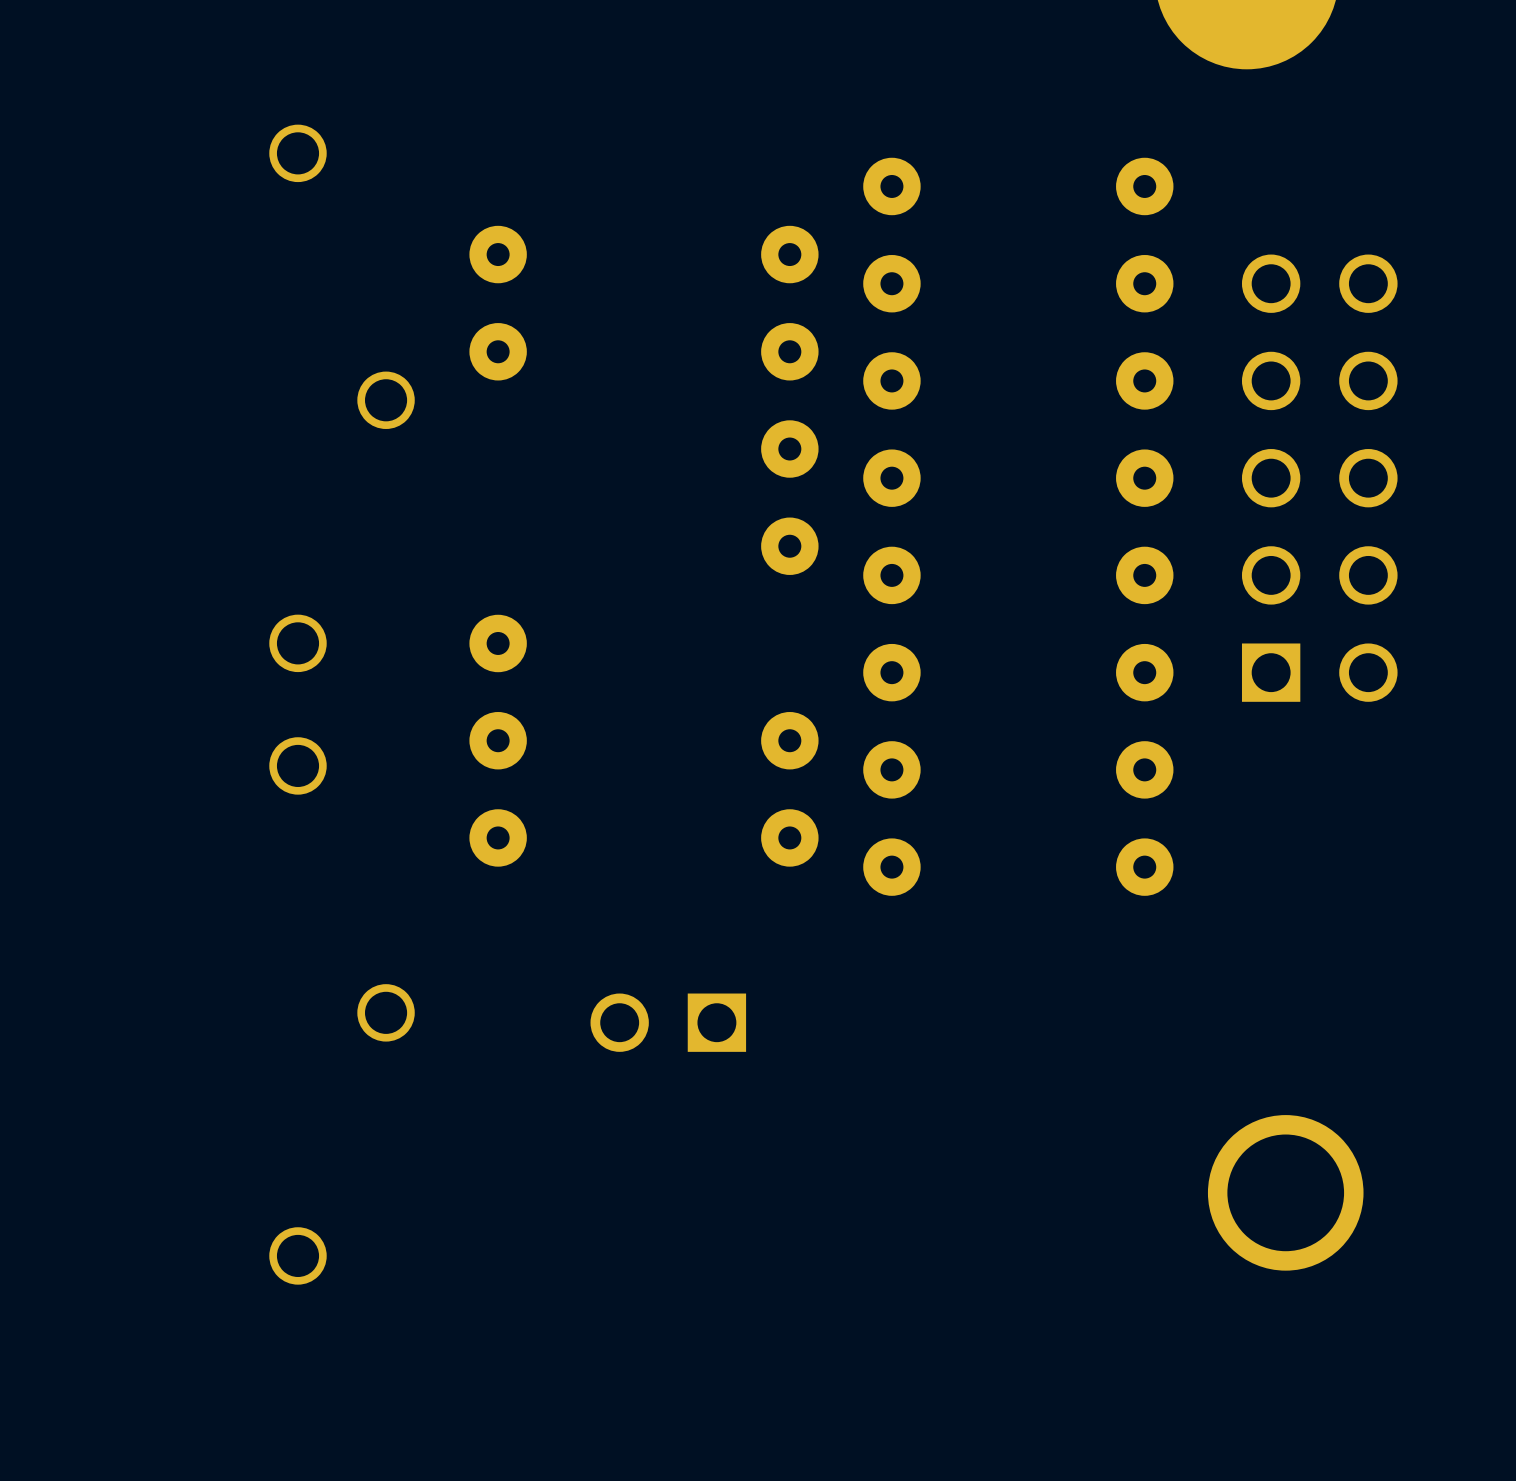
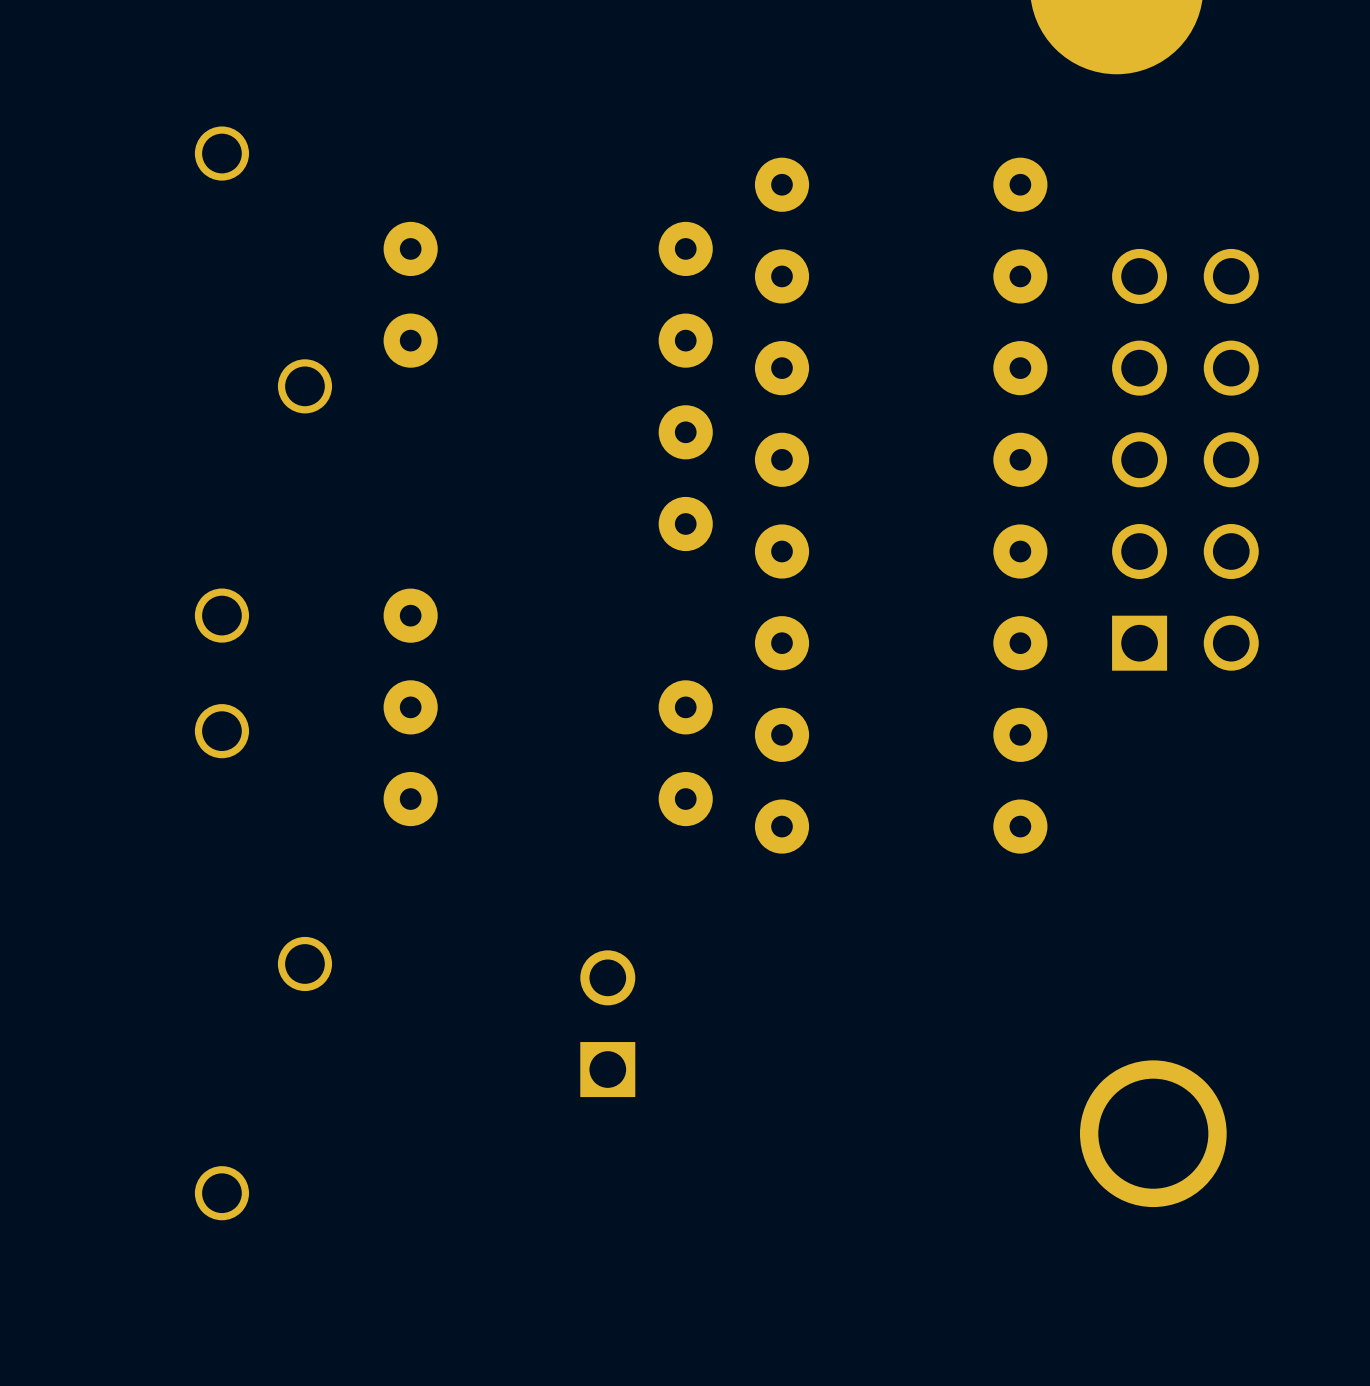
part rotation: 0° (668, 1022) -> 90° clockwise (607, 1023)

